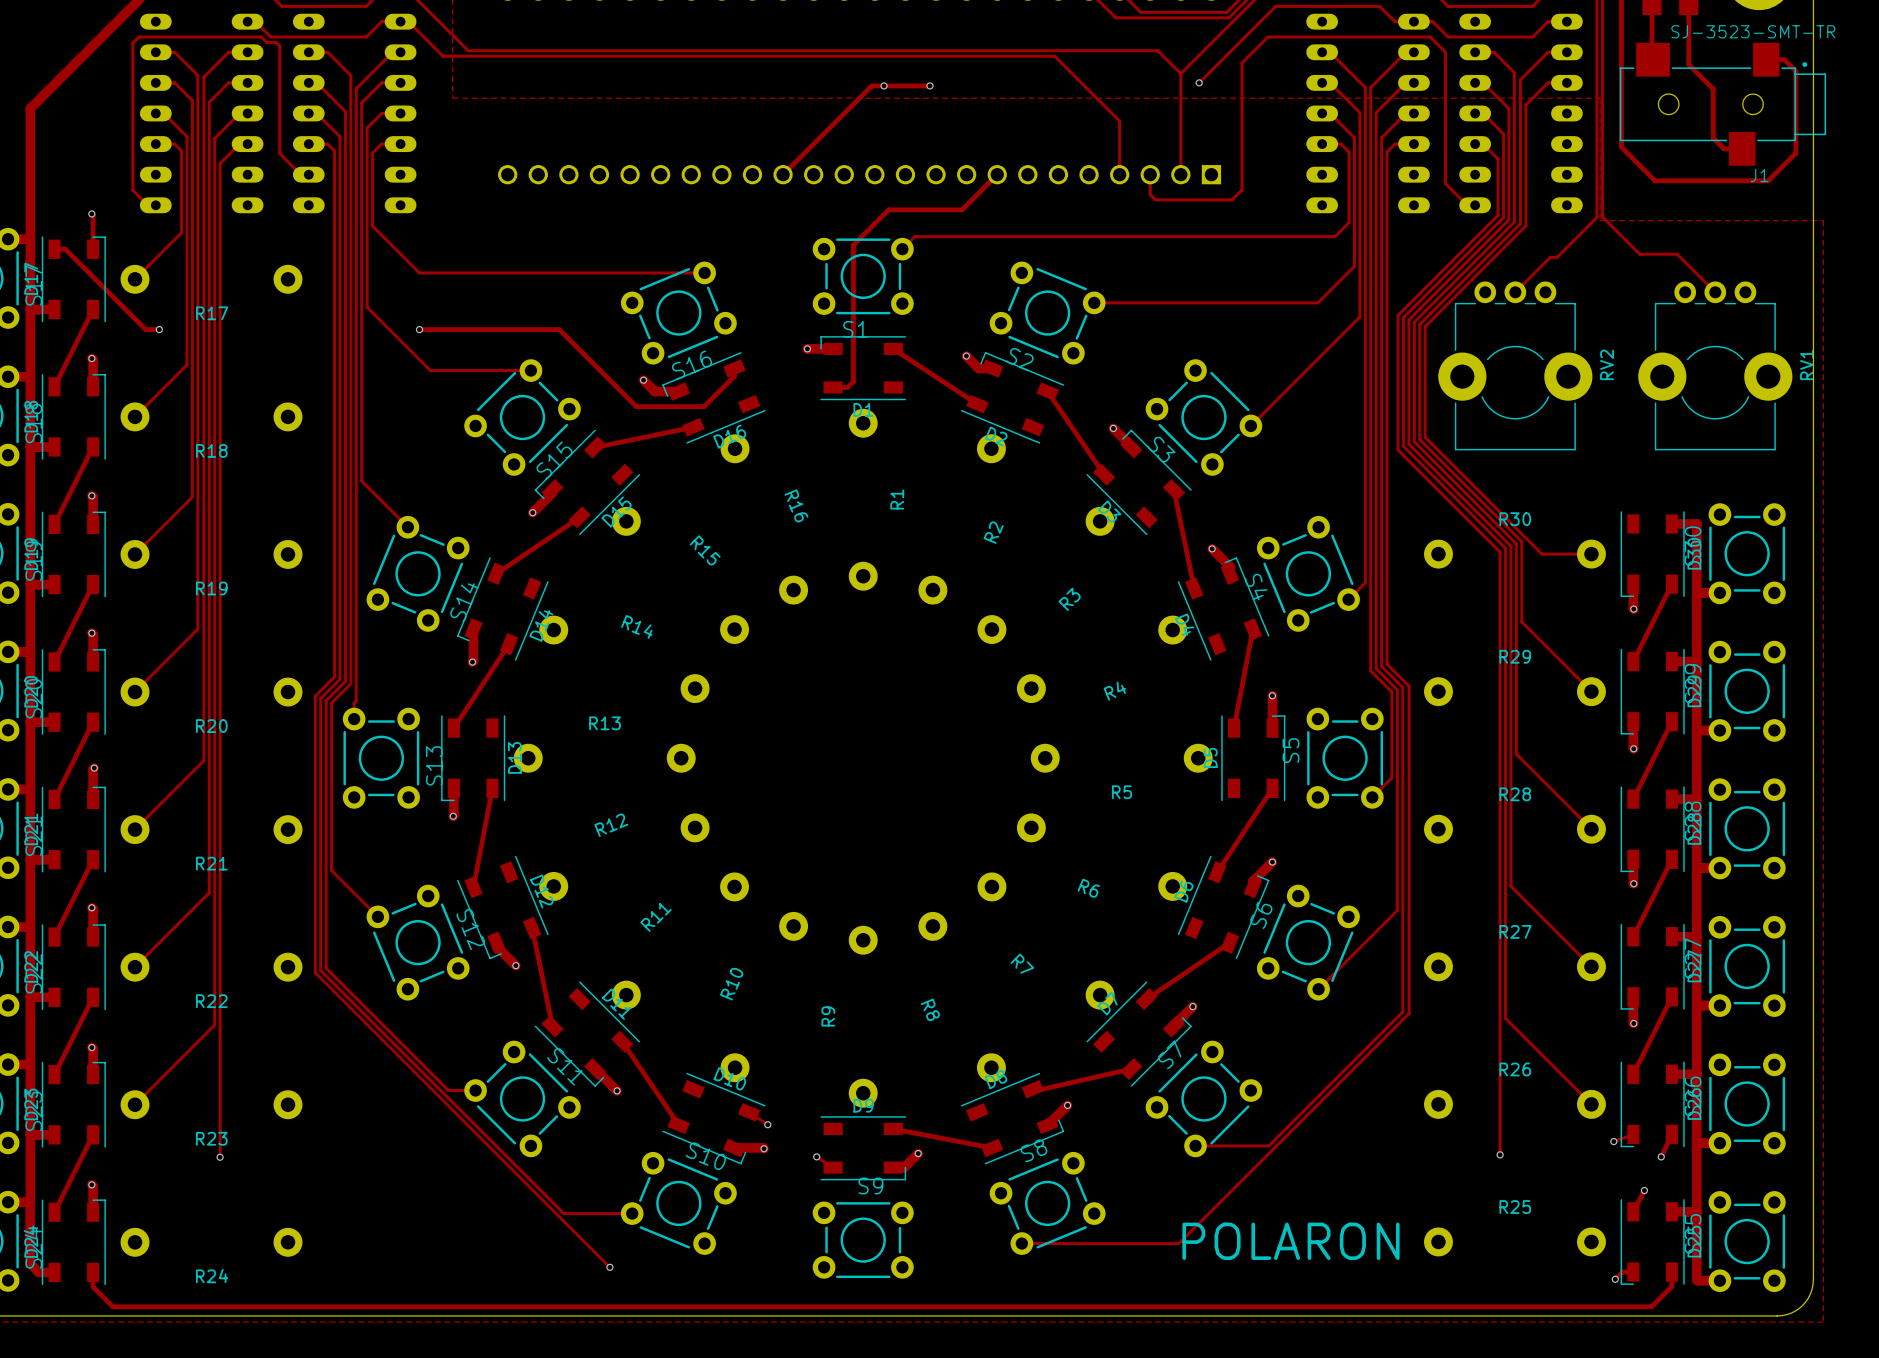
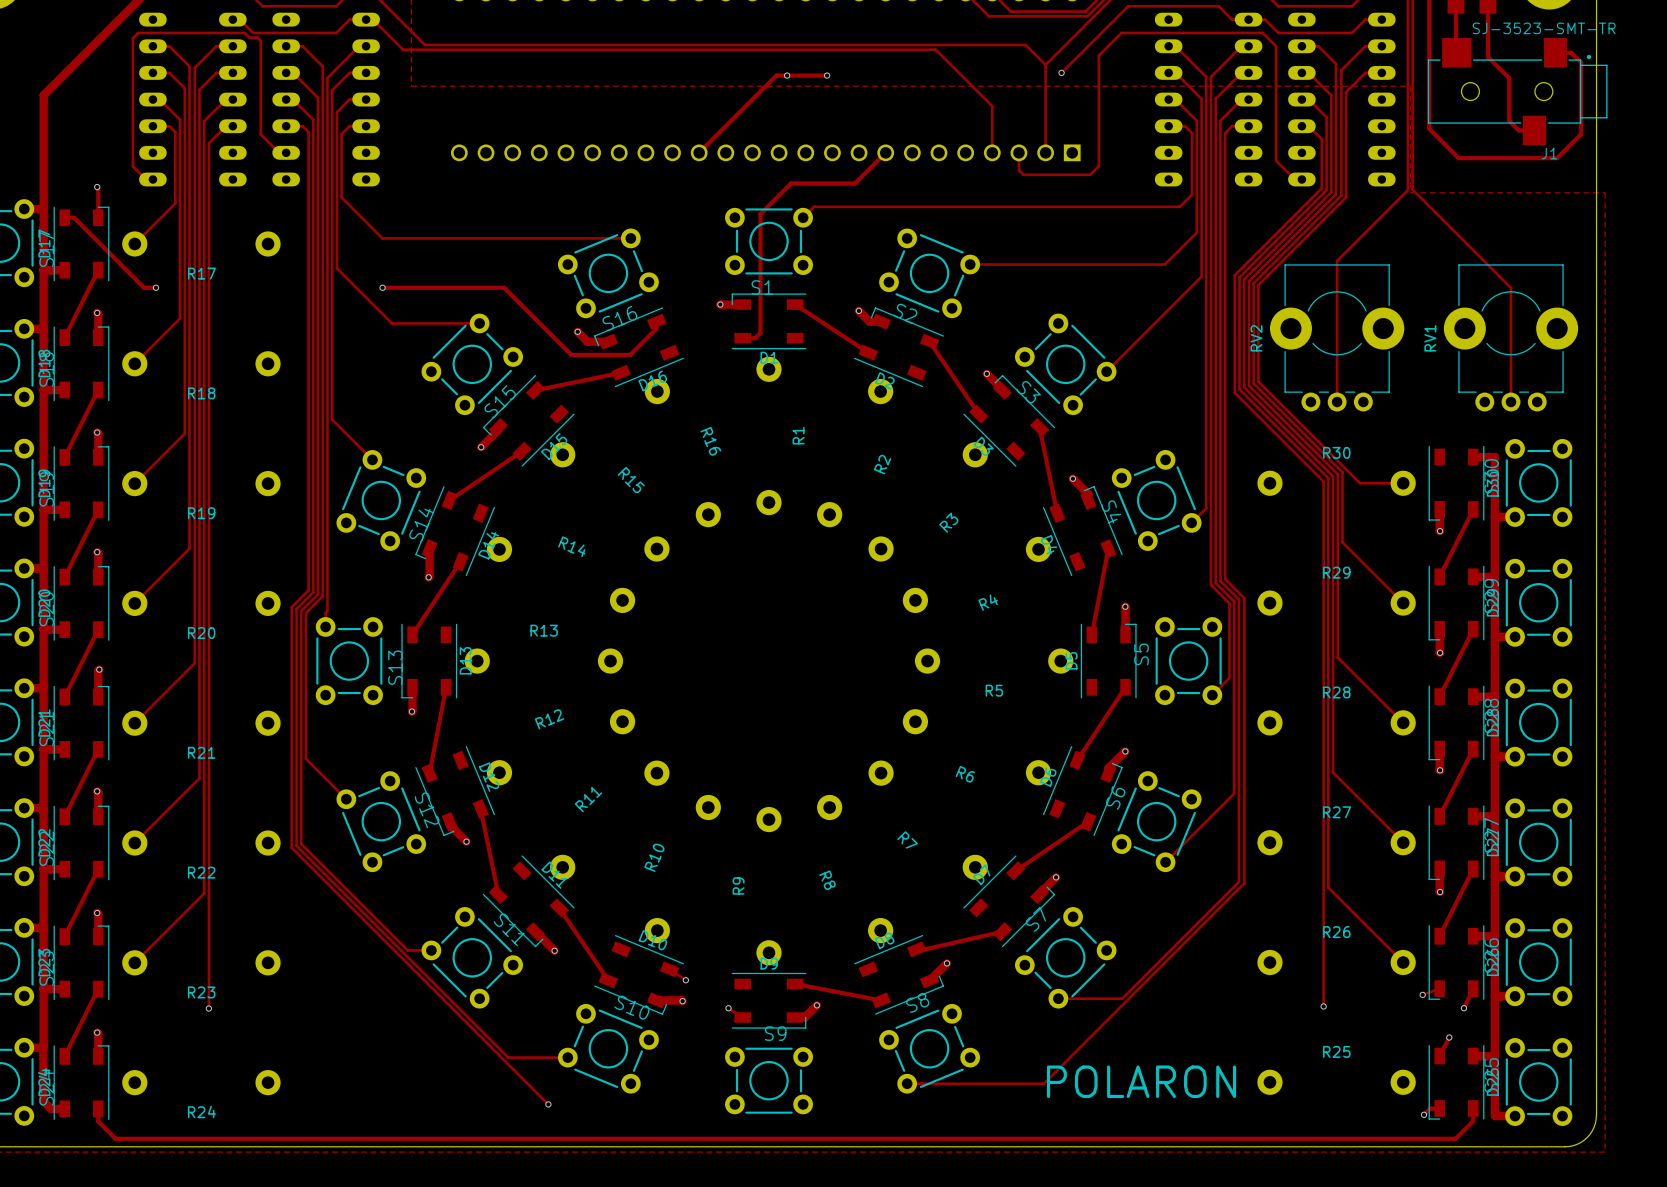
track: (1639, 254) (1677, 254) (1715, 292) -> (1445, 222) (1511, 287) (1511, 402)
track: (1557, 257) (1550, 257) (1515, 292) -> (1373, 224) (1337, 261) (1337, 402)
RV2 rotation: 0° (1515, 365) -> 180° (1337, 337)
RV1 rotation: 0° (1715, 365) -> 180° (1511, 337)

